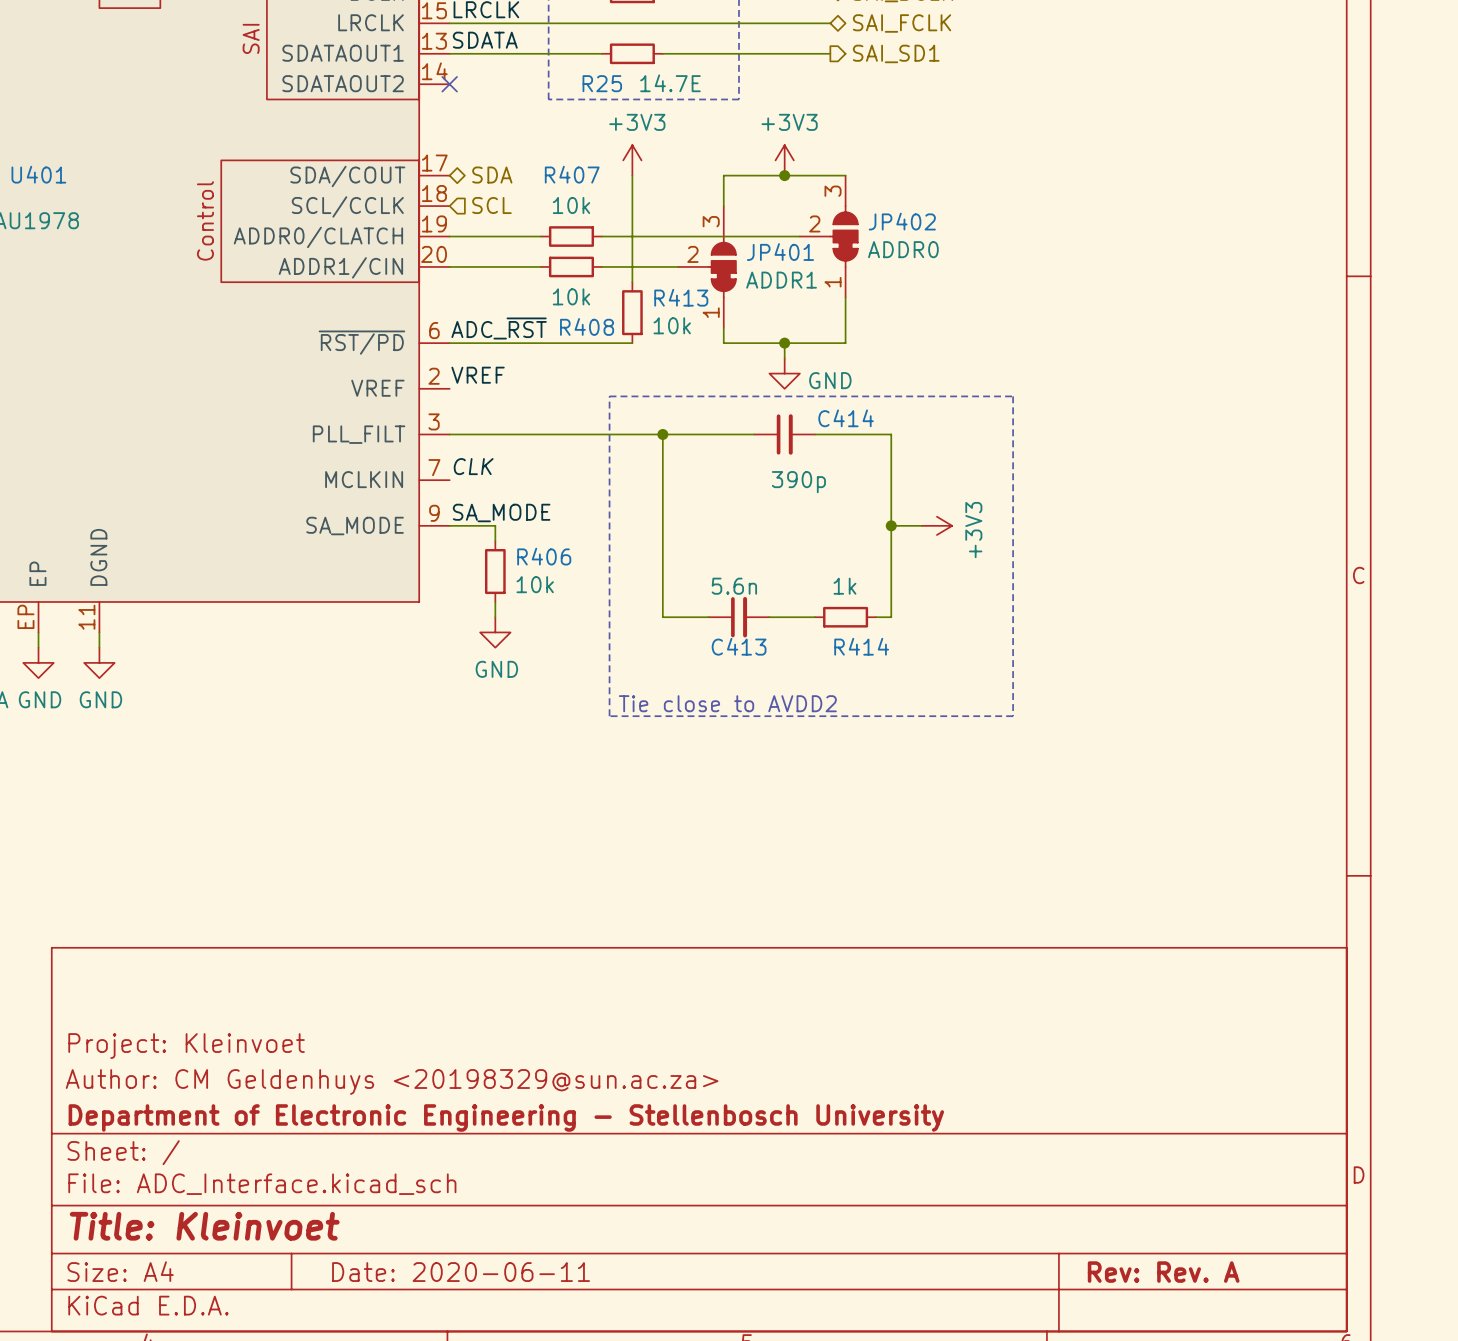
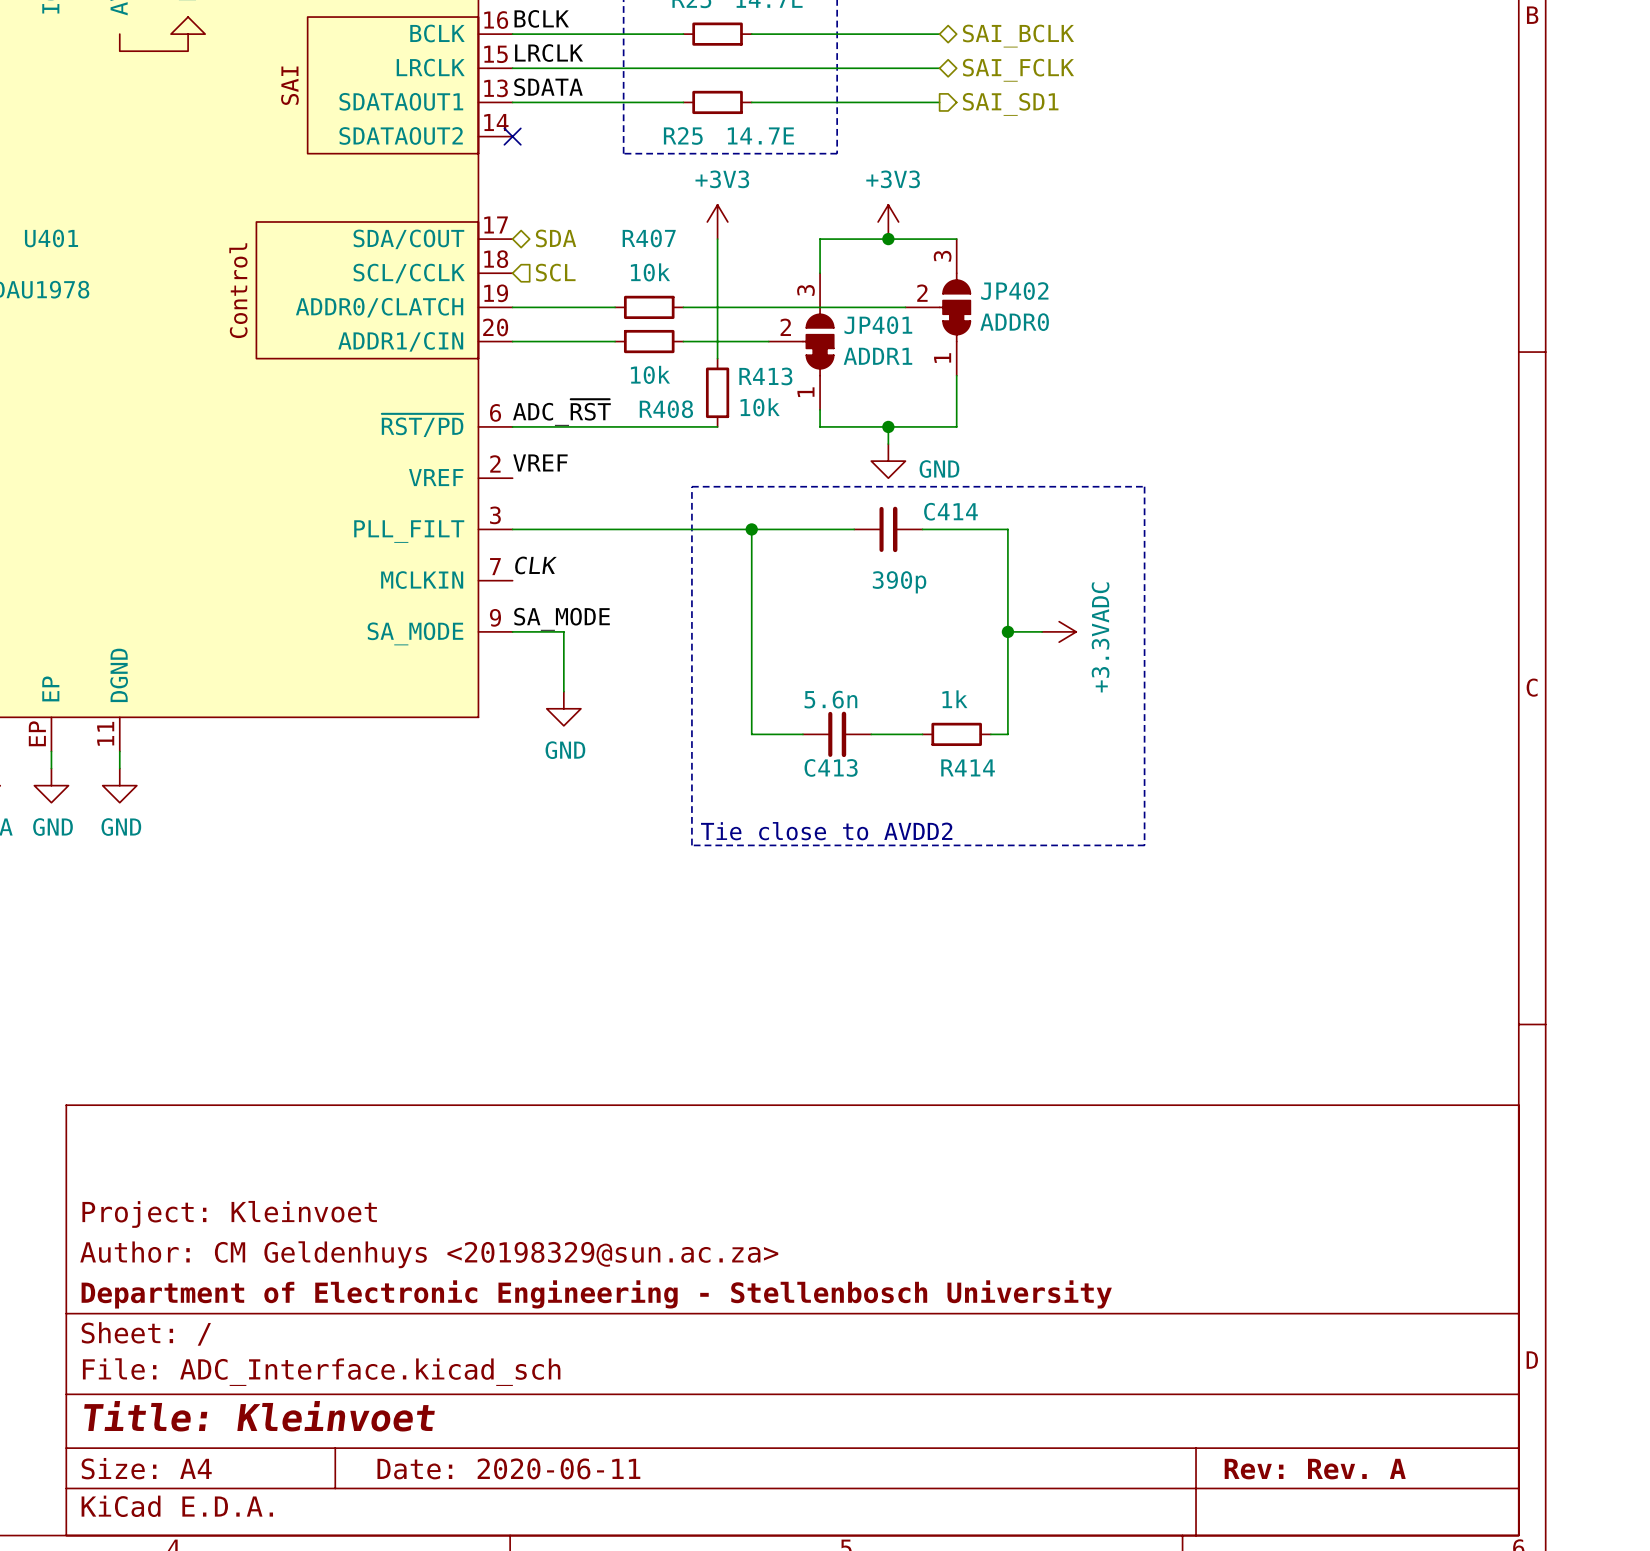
power symbol: +3V3 (936, 525) -> +3.3VADC (1059, 631)
wire: none -> (563, 648) (563, 691)
R406: 10k (495, 571) -> none
wire: (495, 601) (495, 617) -> none
power symbol position: GND (495, 632) -> GND (563, 708)

